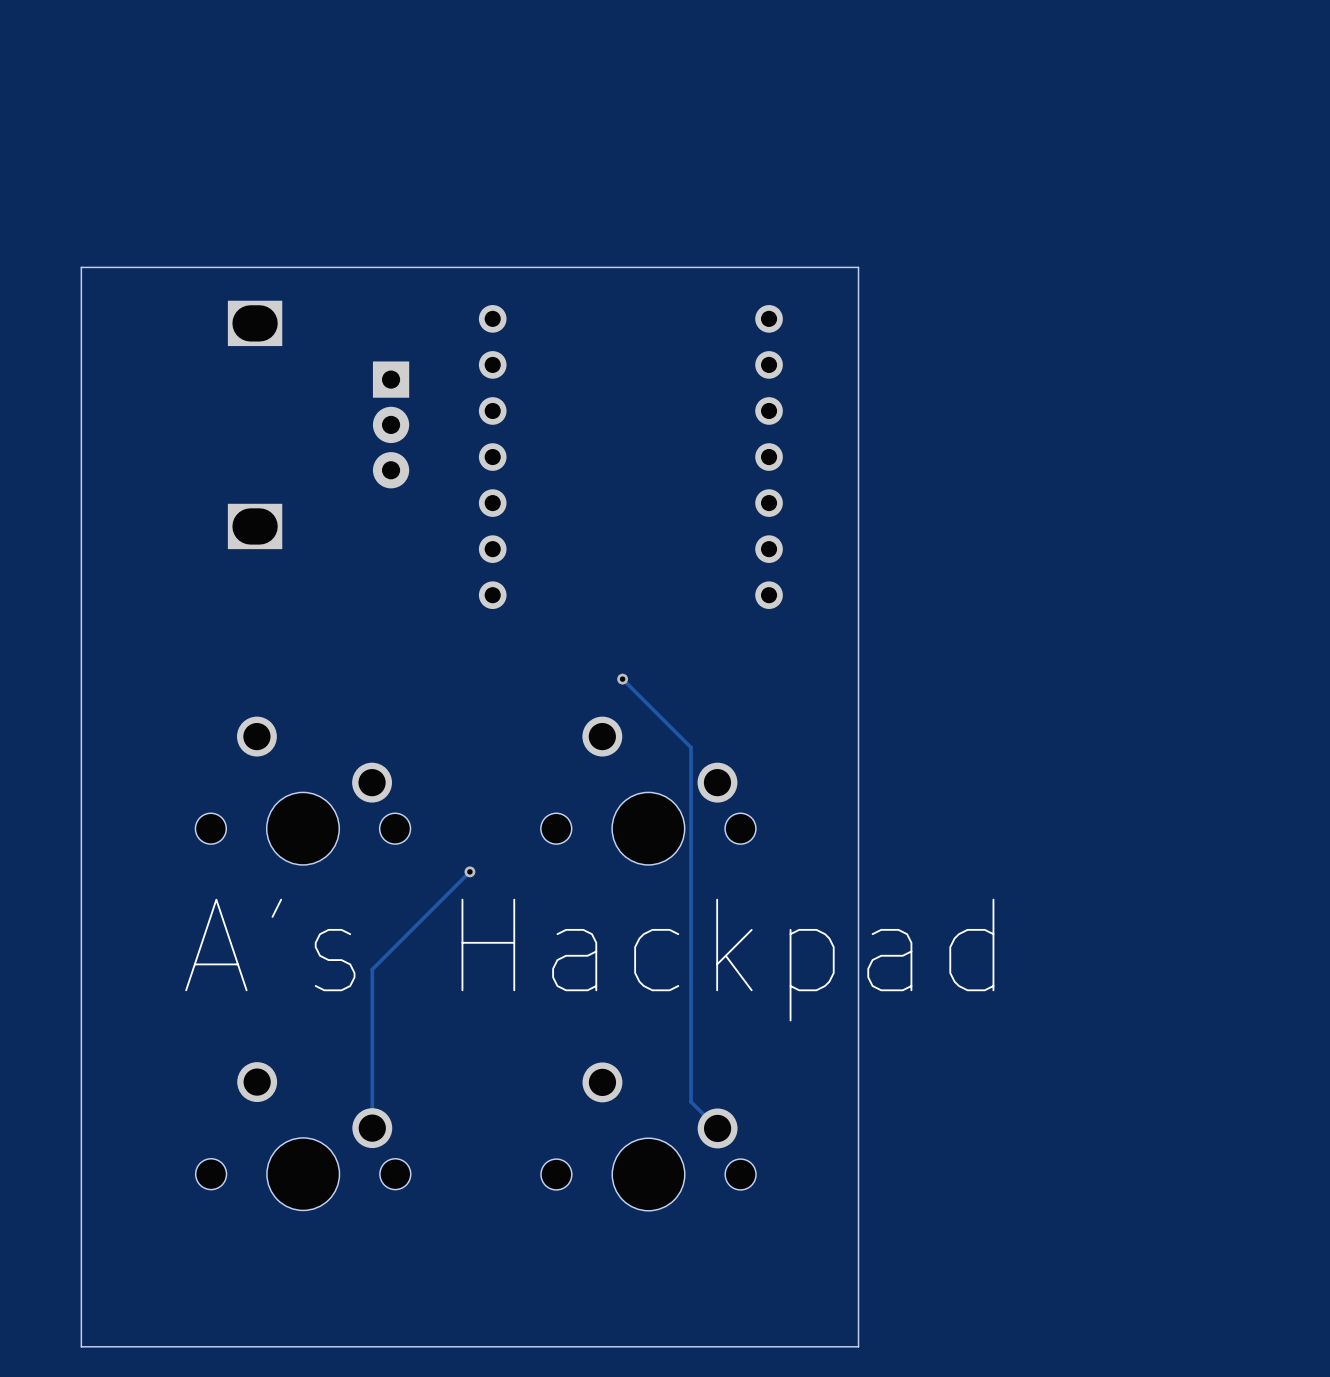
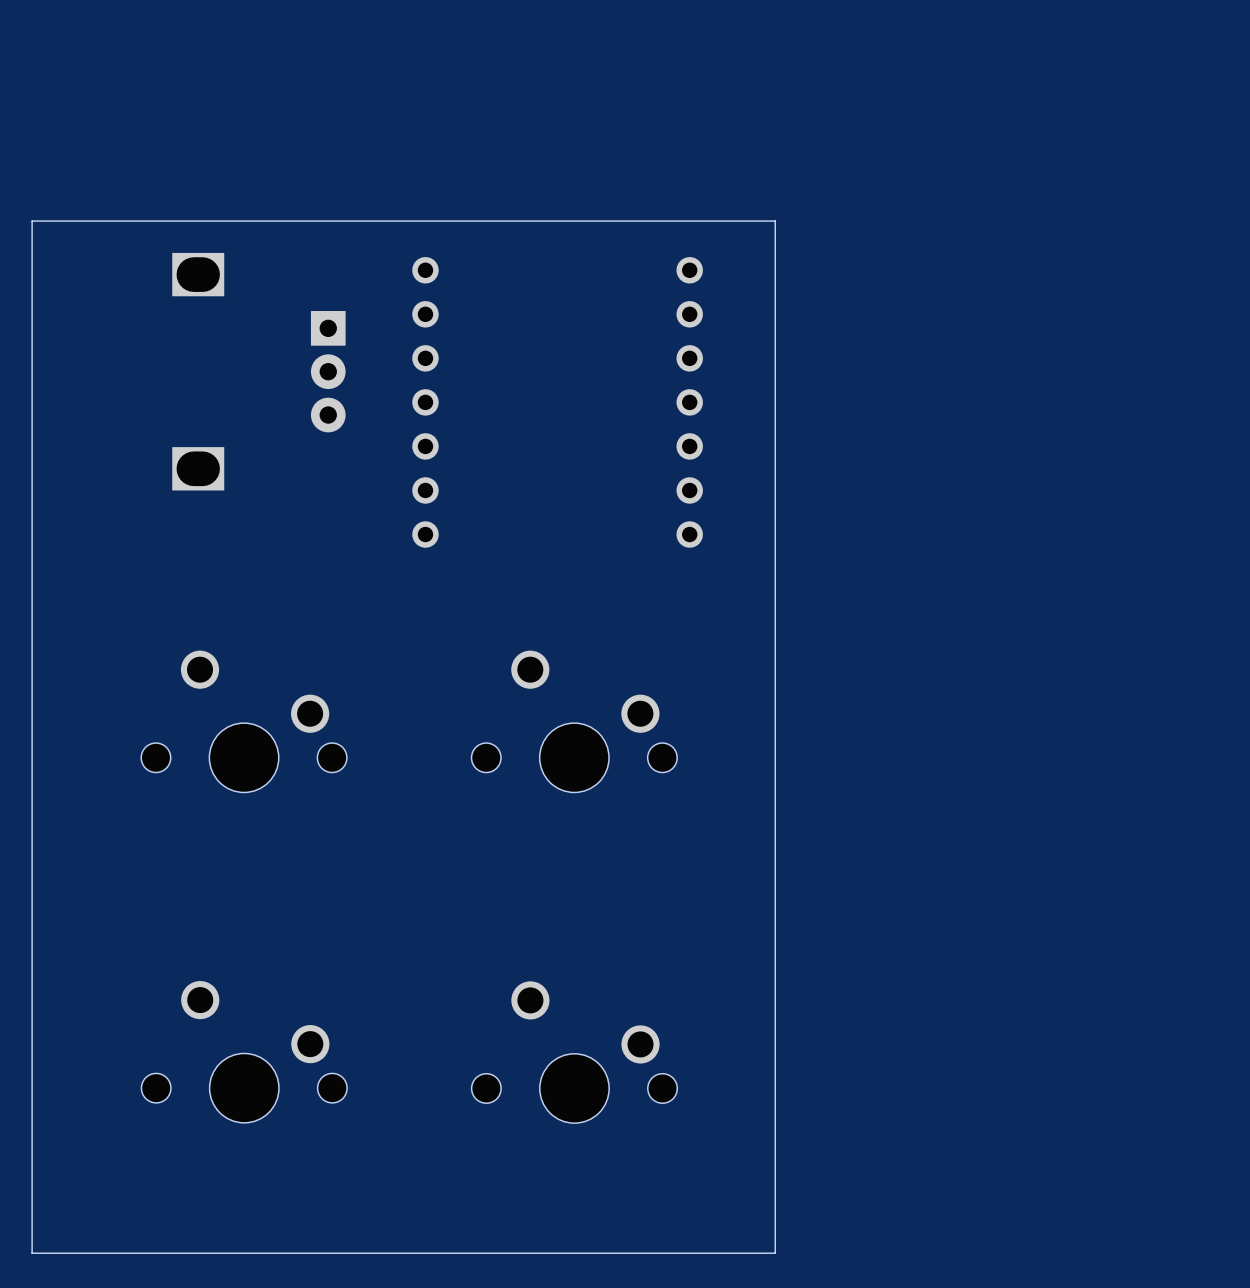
track: (622, 679) (691, 747) (691, 1101) (717, 1128) -> none
via: (622, 679) -> none
track: (469, 871) (372, 969) (372, 1128) -> none
via: (469, 871) -> none
text: A's Hackpad (589, 960) -> none

